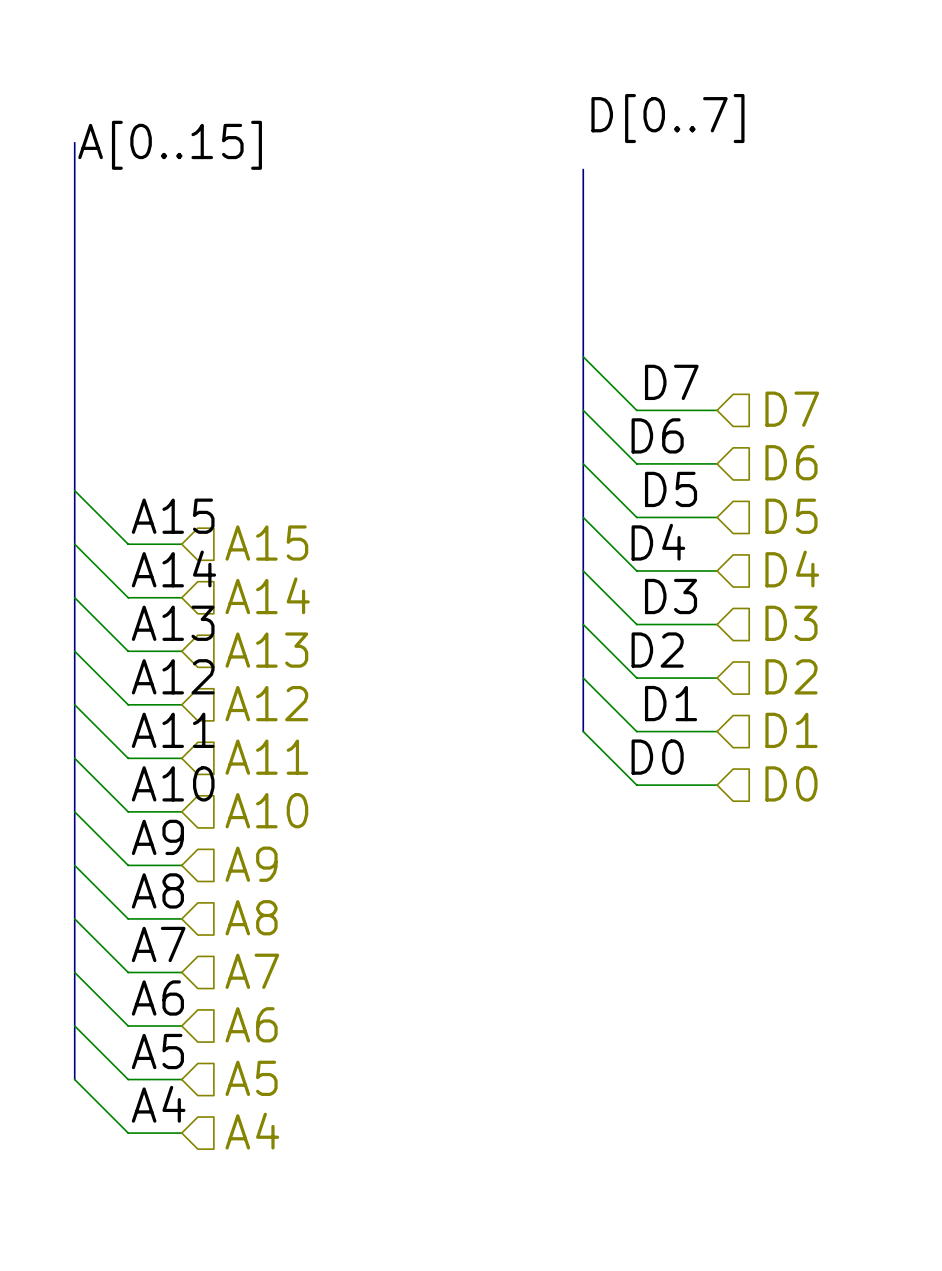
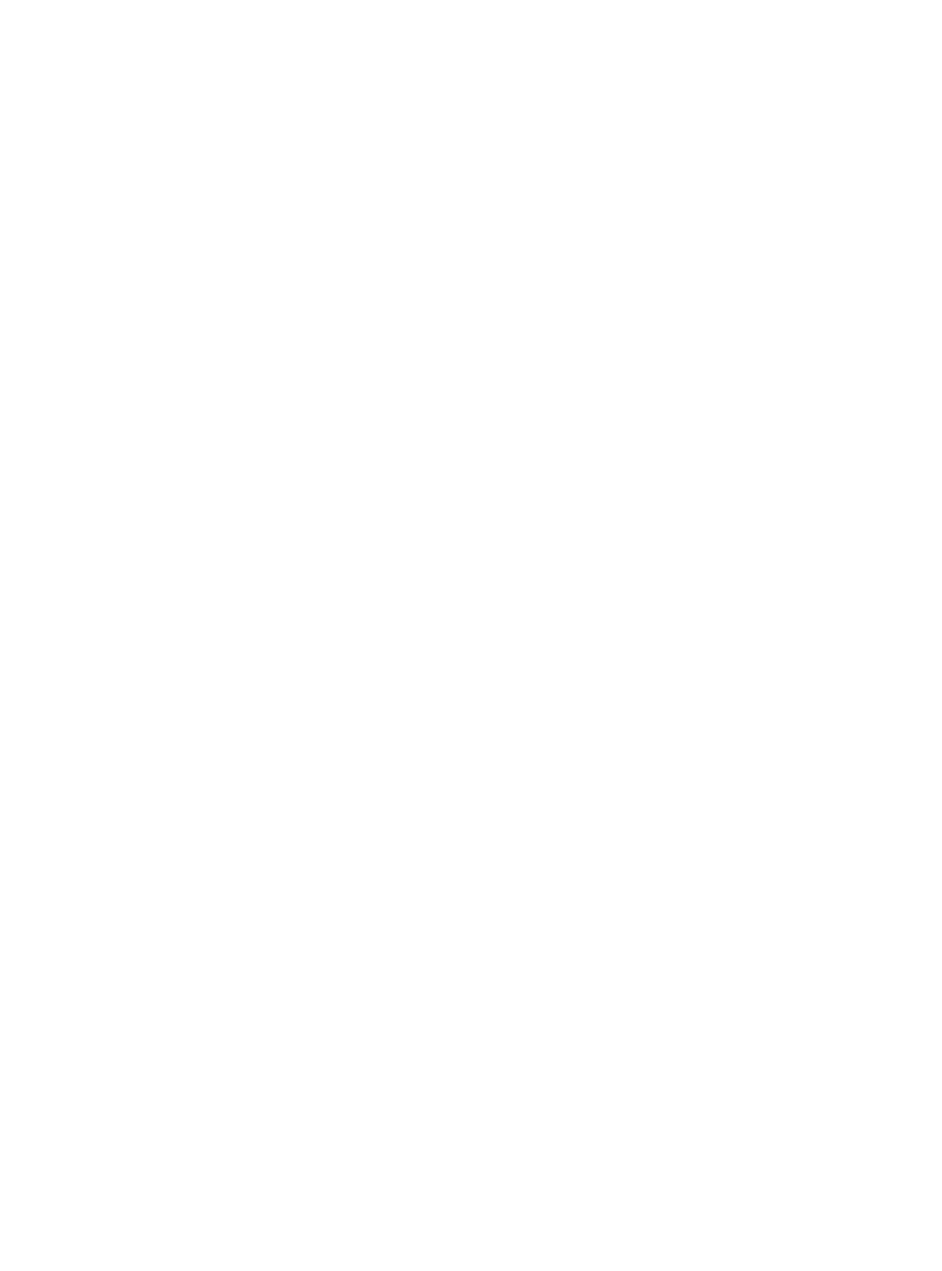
label: D[0..7] (667, 118) -> none
bus: (74, 142) (74, 1079) -> none
label: A[0..15] (170, 145) -> none
bus: (583, 169) (583, 731) -> none
wire: (583, 356) (636, 410) (717, 410) -> none
label: D7 (671, 382) -> none
hierarchical label: D7 (792, 409) -> none
wire: (583, 410) (636, 463) (717, 463) -> none
label: D6 (657, 435) -> none
hierarchical label: D6 (791, 462) -> none
wire: (583, 463) (636, 517) (717, 517) -> none
label: D5 (671, 489) -> none
wire: (74, 490) (128, 544) (181, 544) -> none
label: A15 (173, 516) -> none
hierarchical label: D5 (791, 516) -> none
wire: (583, 517) (636, 570) (717, 570) -> none
label: D4 (658, 542) -> none
hierarchical label: A15 (266, 543) -> none
wire: (74, 544) (128, 597) (181, 597) -> none
label: A14 (173, 568) -> none
hierarchical label: D4 (792, 569) -> none
wire: (583, 570) (636, 624) (717, 624) -> none
hierarchical label: A14 (267, 595) -> none
label: D3 (671, 596) -> none
wire: (74, 597) (128, 651) (181, 651) -> none
label: A13 (173, 623) -> none
hierarchical label: D3 (791, 623) -> none
wire: (583, 624) (636, 678) (717, 678) -> none
hierarchical label: A13 (266, 650) -> none
label: D2 (657, 650) -> none
wire: (74, 651) (128, 704) (181, 704) -> none
label: A12 (173, 676) -> none
hierarchical label: D2 (791, 676) -> none
wire: (583, 678) (636, 731) (717, 731) -> none
hierarchical label: A12 (266, 703) -> none
label: D1 (671, 703) -> none
wire: (74, 704) (128, 758) (181, 758) -> none
label: A11 (173, 730) -> none
hierarchical label: D1 (791, 730) -> none
wire: (583, 731) (636, 785) (717, 785) -> none
hierarchical label: A11 (266, 757) -> none
label: D0 (657, 757) -> none
wire: (74, 758) (128, 811) (181, 811) -> none
label: A10 (173, 783) -> none
hierarchical label: D0 (791, 783) -> none
hierarchical label: A10 (266, 810) -> none
wire: (74, 811) (128, 865) (181, 865) -> none
label: A9 (157, 837) -> none
hierarchical label: A9 (251, 864) -> none
wire: (74, 865) (128, 918) (181, 918) -> none
label: A8 (157, 890) -> none
hierarchical label: A8 (251, 917) -> none
wire: (74, 918) (128, 972) (181, 972) -> none
label: A7 (158, 944) -> none
hierarchical label: A7 (252, 971) -> none
wire: (74, 972) (128, 1026) (181, 1026) -> none
label: A6 (157, 997) -> none
hierarchical label: A6 (251, 1024) -> none
wire: (74, 1026) (128, 1079) (181, 1079) -> none
label: A5 (157, 1051) -> none
hierarchical label: A5 (251, 1078) -> none
wire: (74, 1079) (128, 1133) (181, 1133) -> none
label: A4 (158, 1104) -> none
hierarchical label: A4 (252, 1131) -> none

